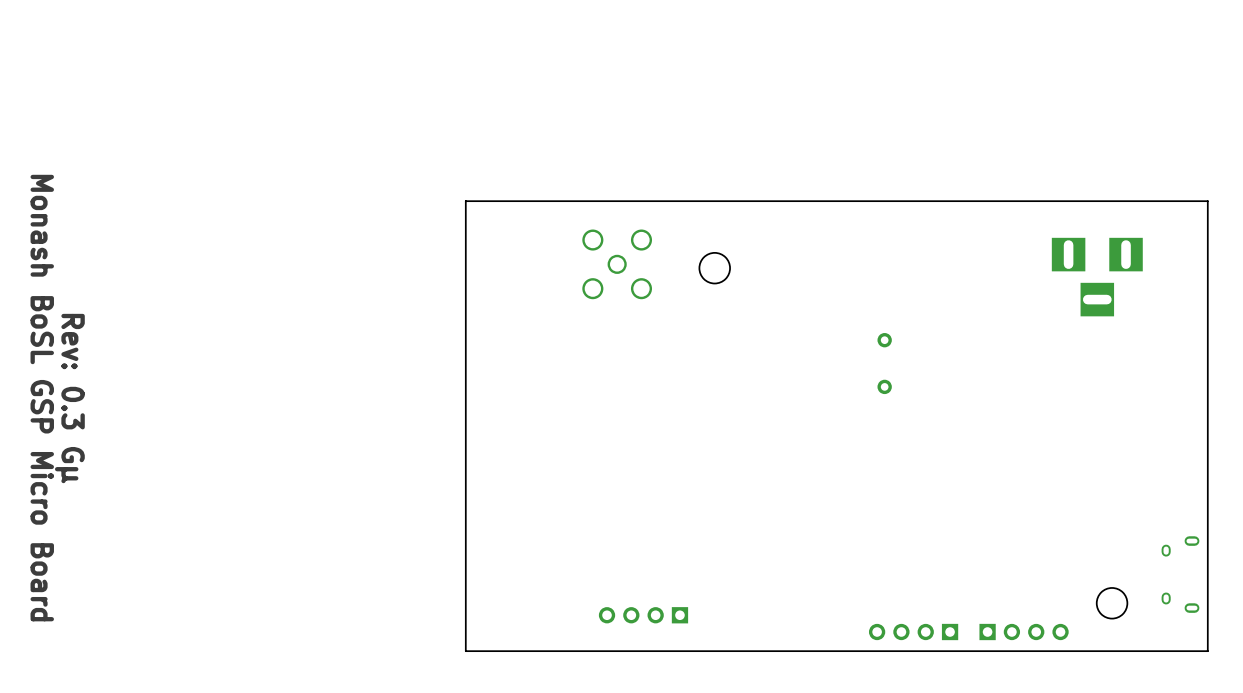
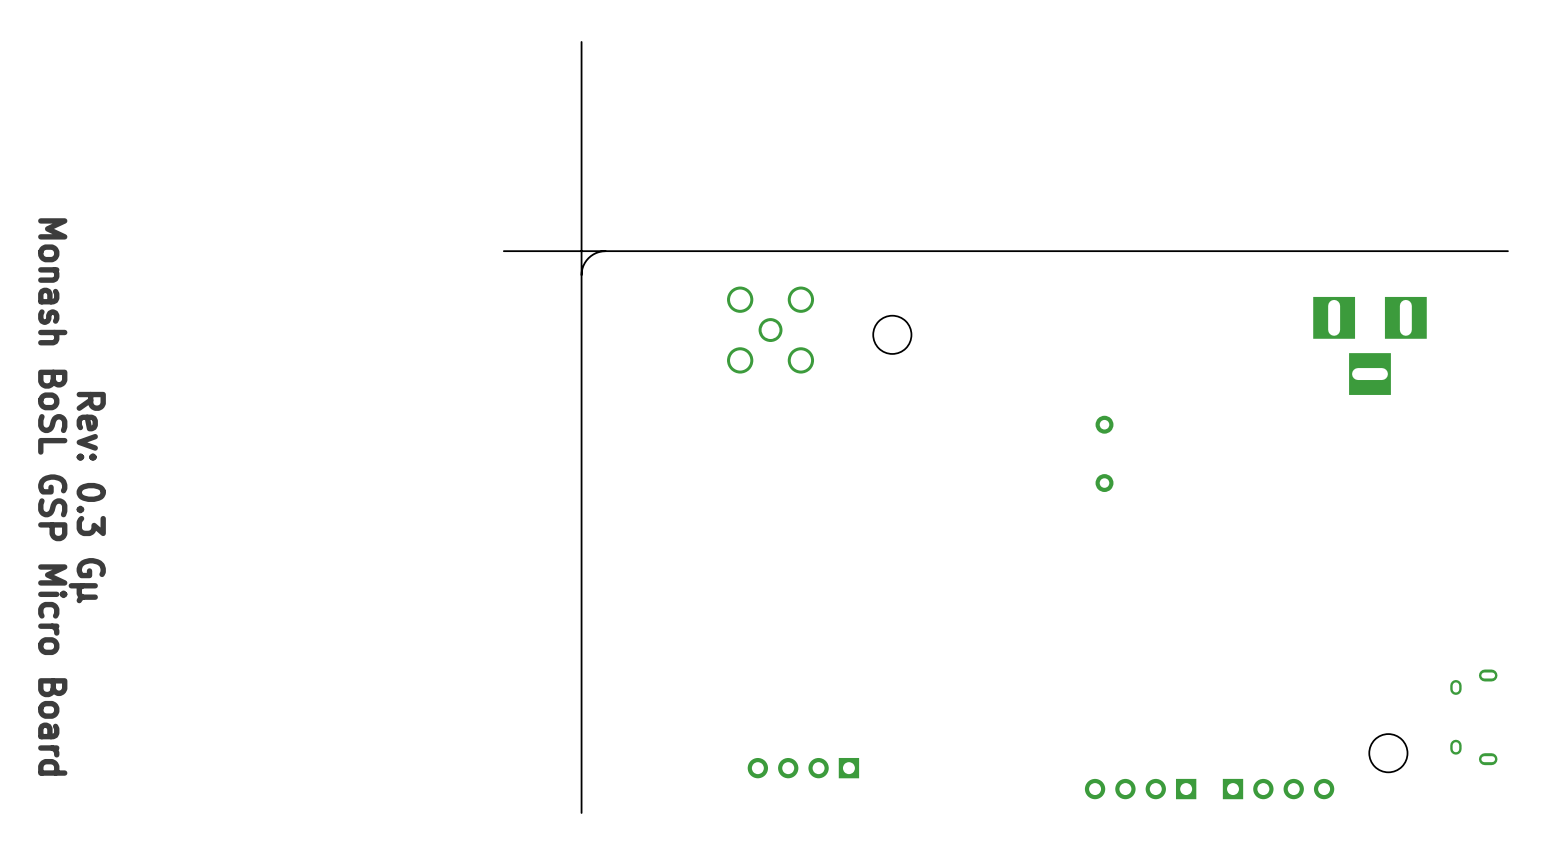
board edge: none -> (581, 41) (581, 251) (503, 251)
board edge: none -> (605, 251) (596, 252) (588, 258) (583, 265) (581, 275)
board edge: (1207, 201) (1207, 651) (465, 651) -> none

